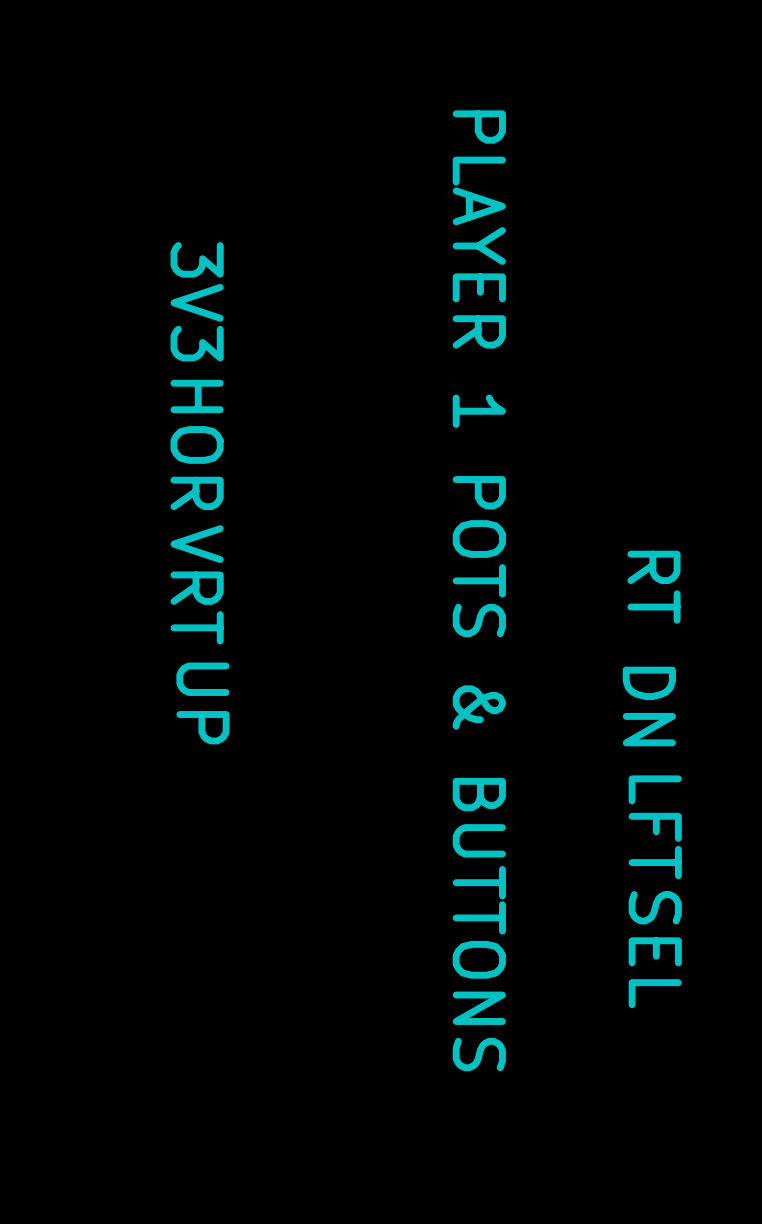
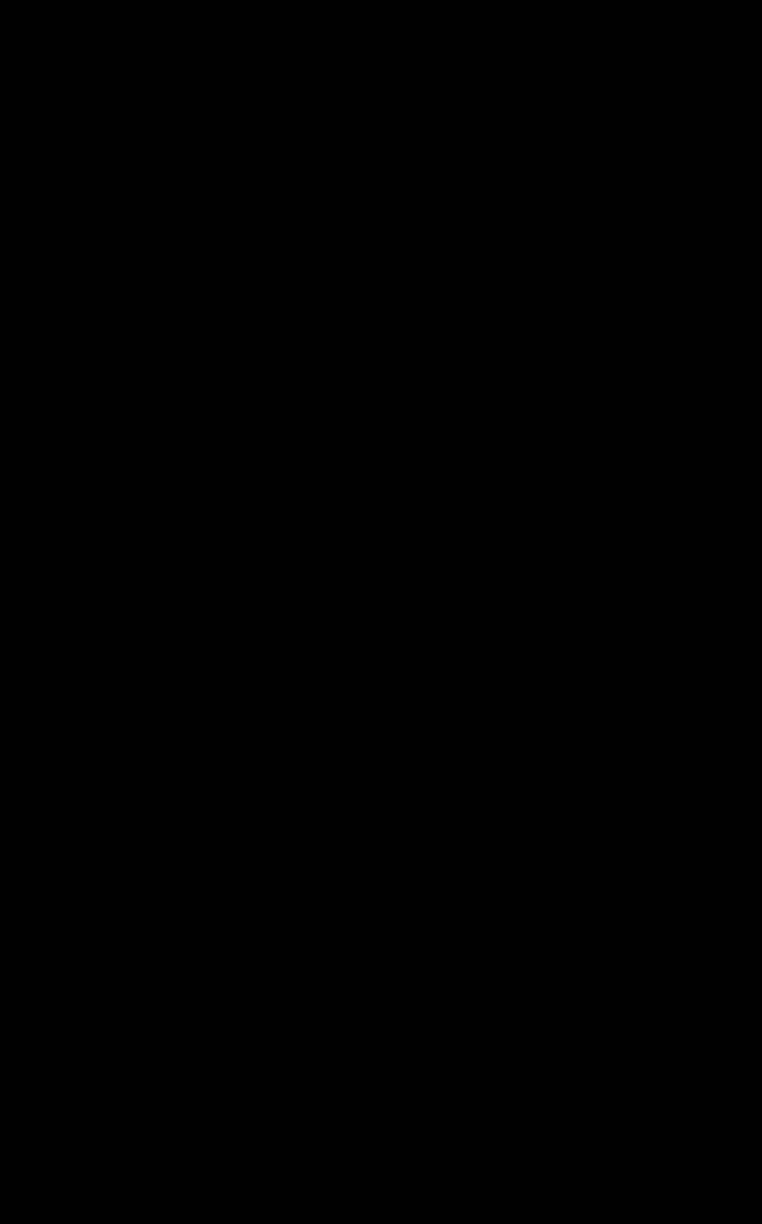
text: 3V3 (197, 301) -> none
text: HOR (197, 444) -> none
text: VRT (197, 584) -> none
text: RT (653, 587) -> none
text: PLAYER 1 POTS & BUTTONS (479, 590) -> none
text: UP (202, 703) -> none
text: DN (649, 706) -> none
text: LFT (655, 827) -> none
text: SEL (655, 949) -> none

